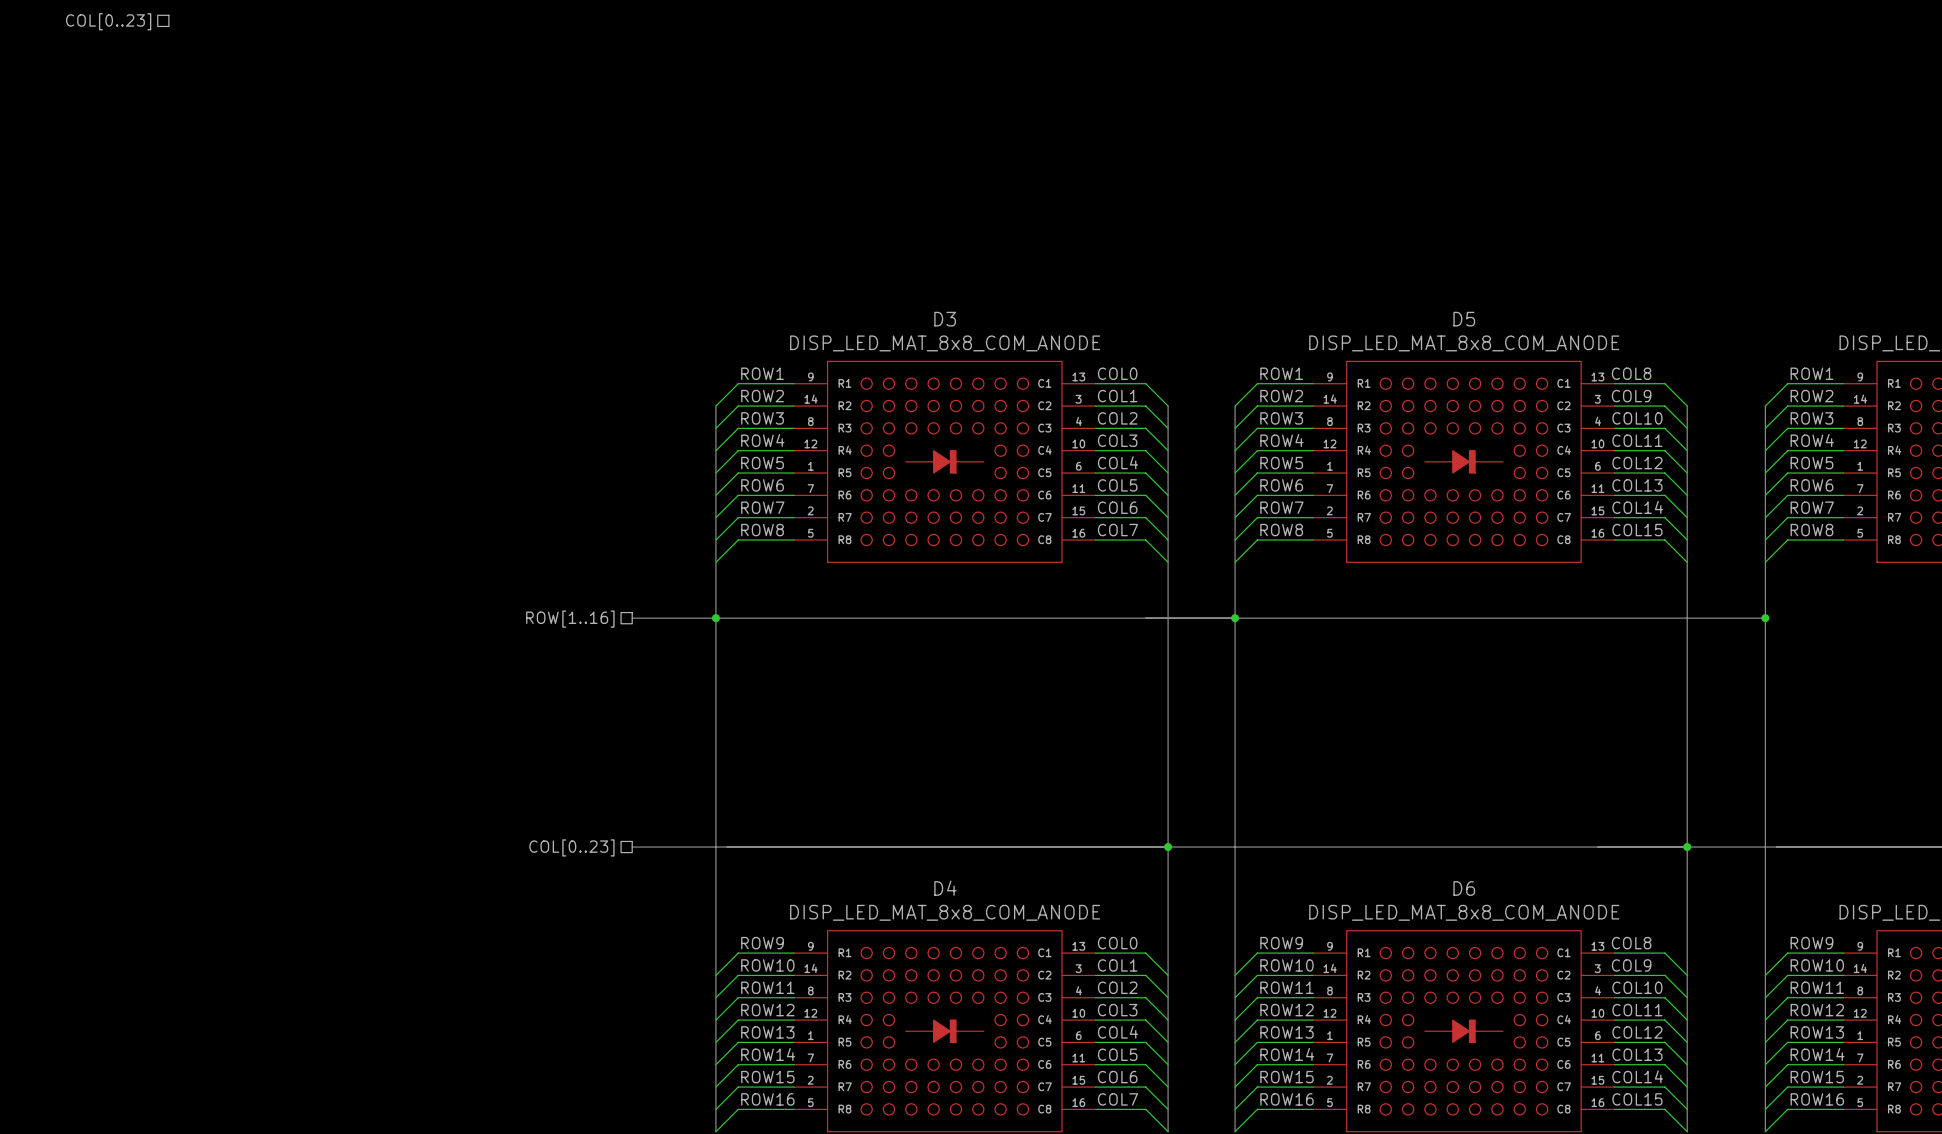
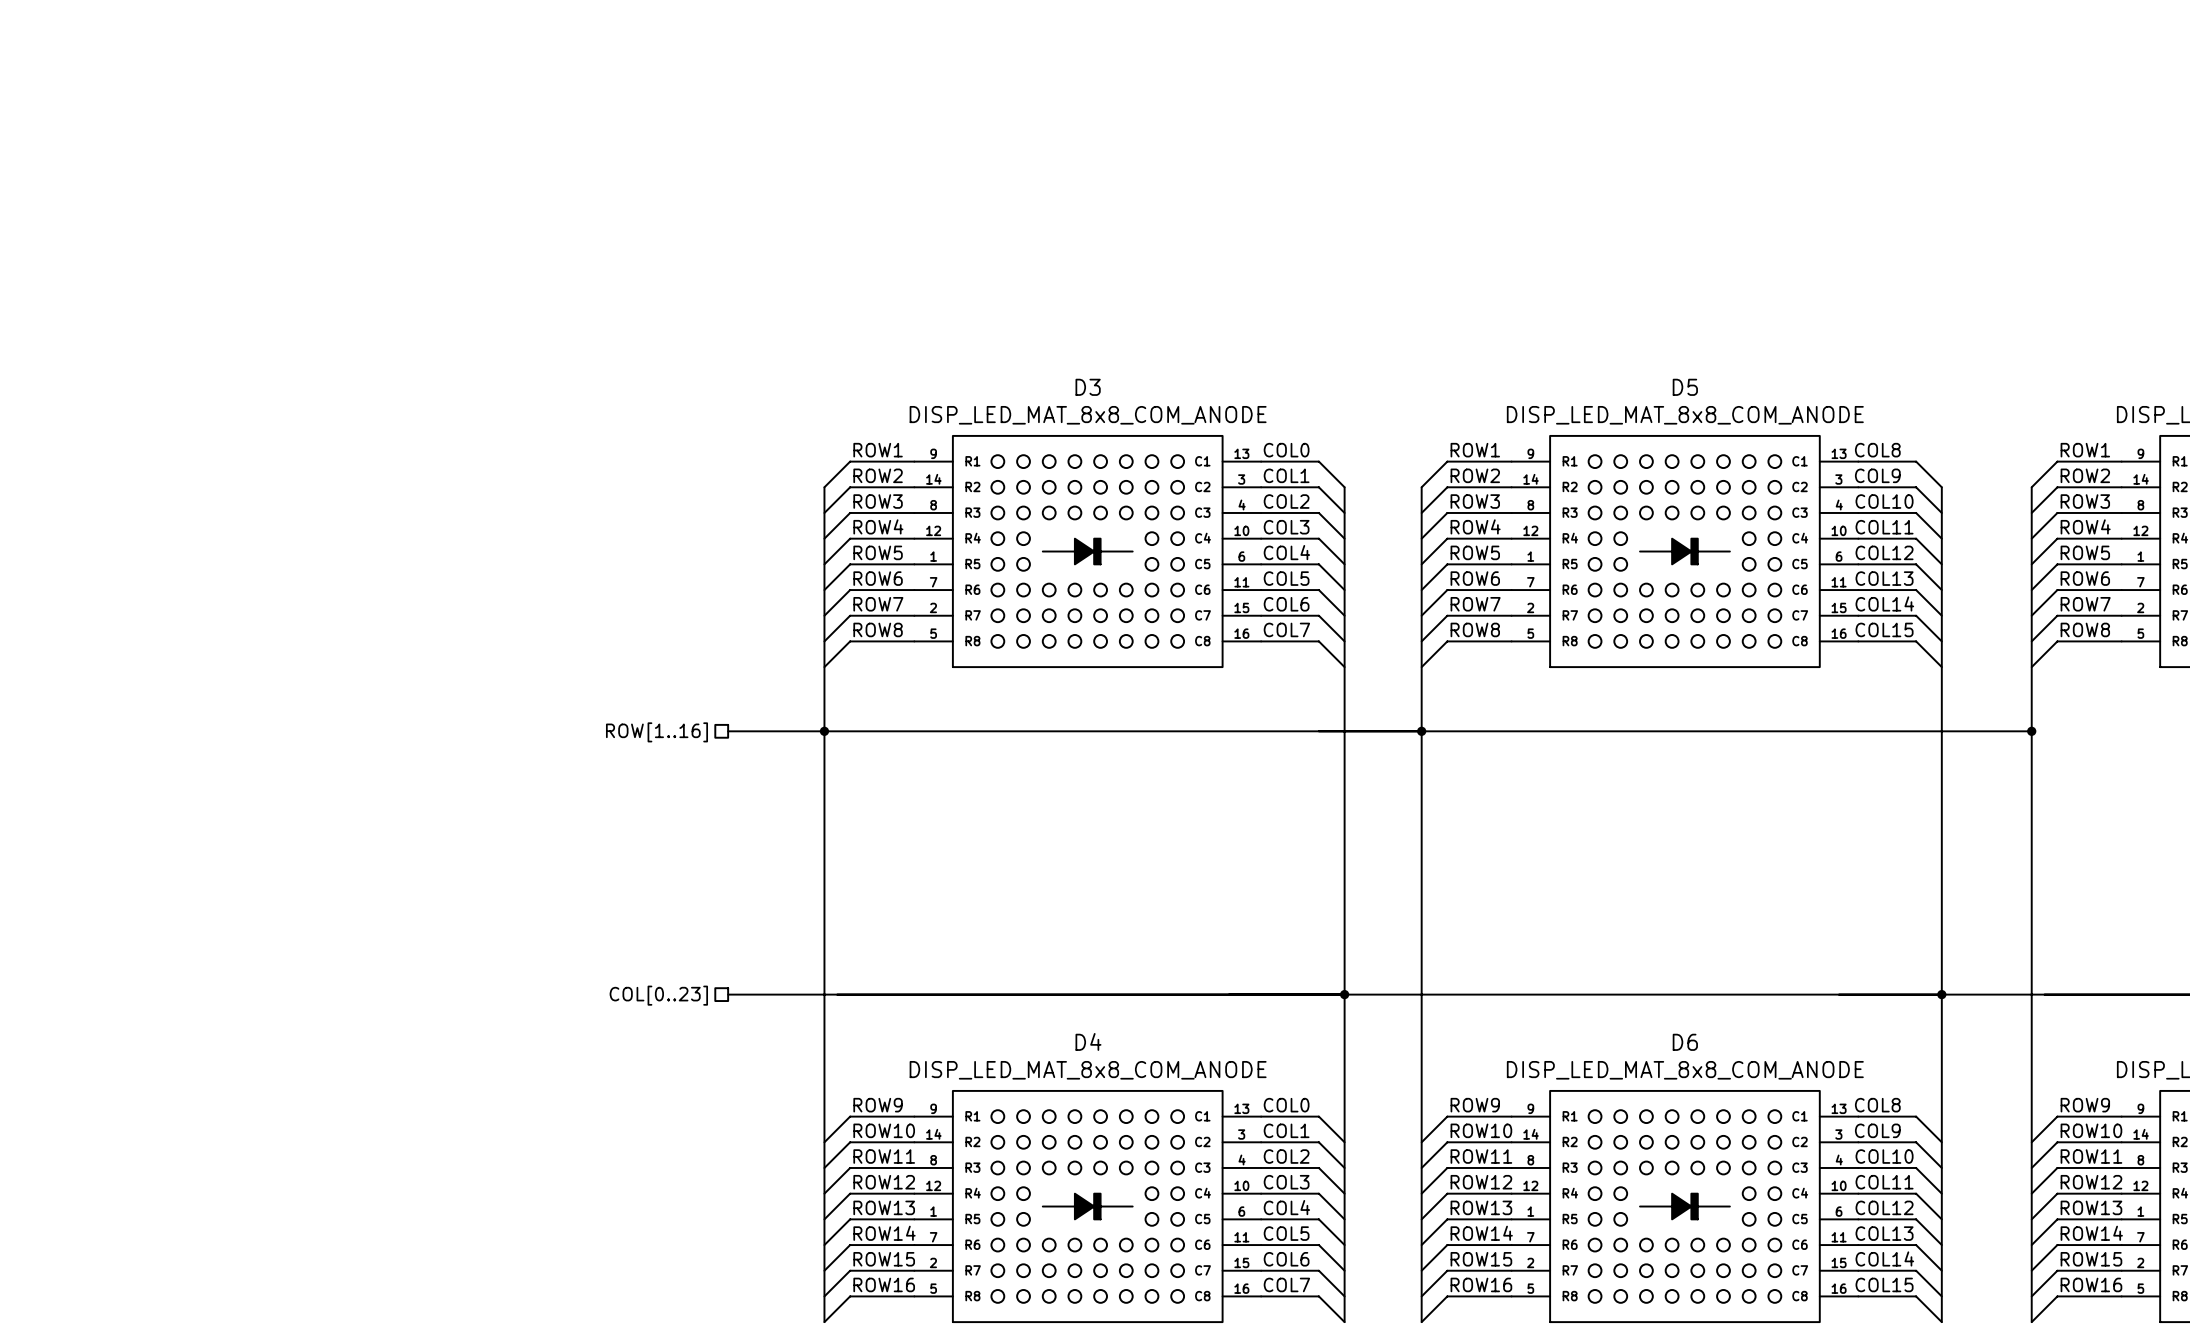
hierarchical label: COL[0..23] (108, 21) -> none

